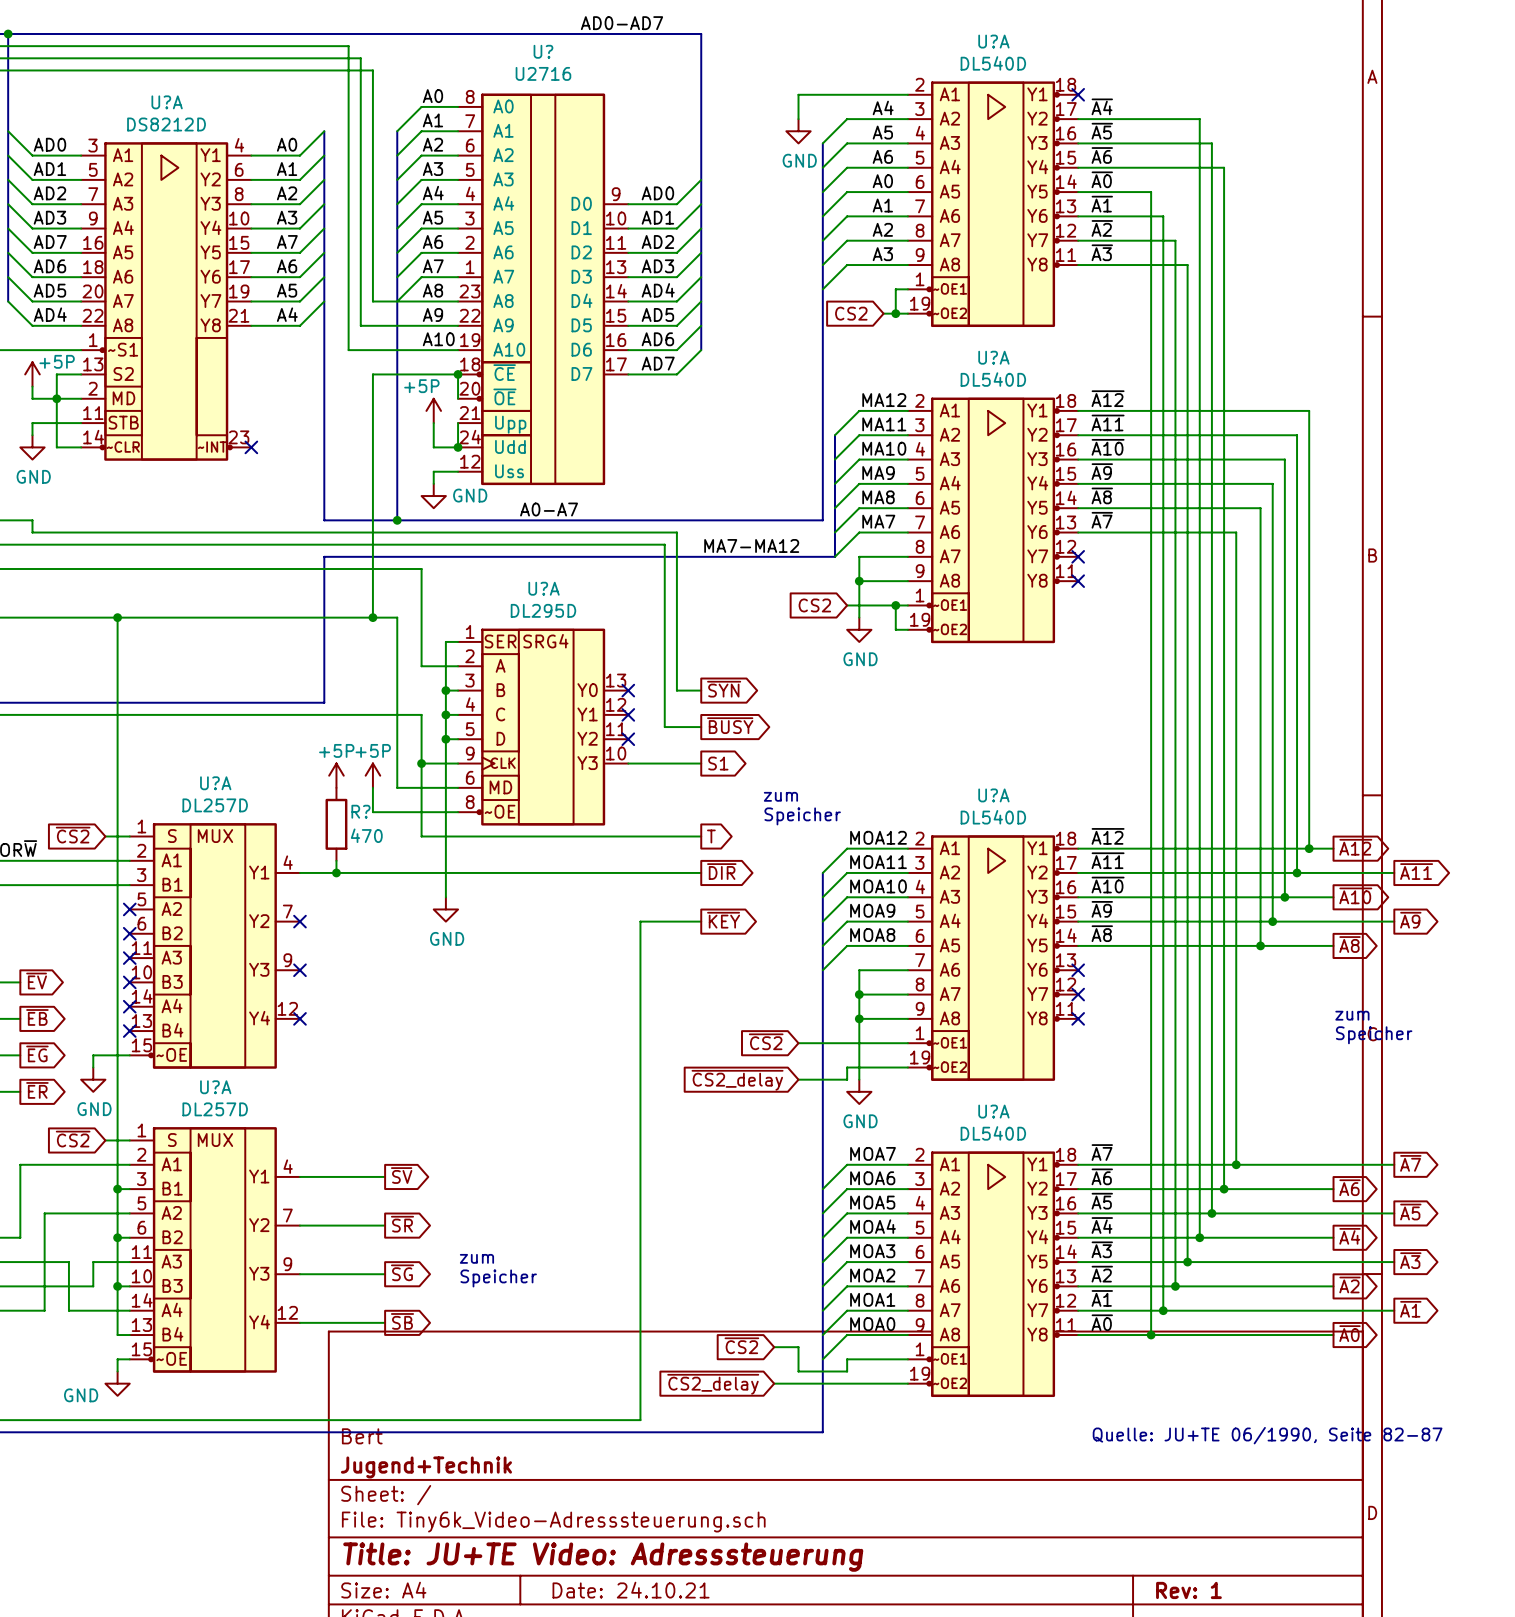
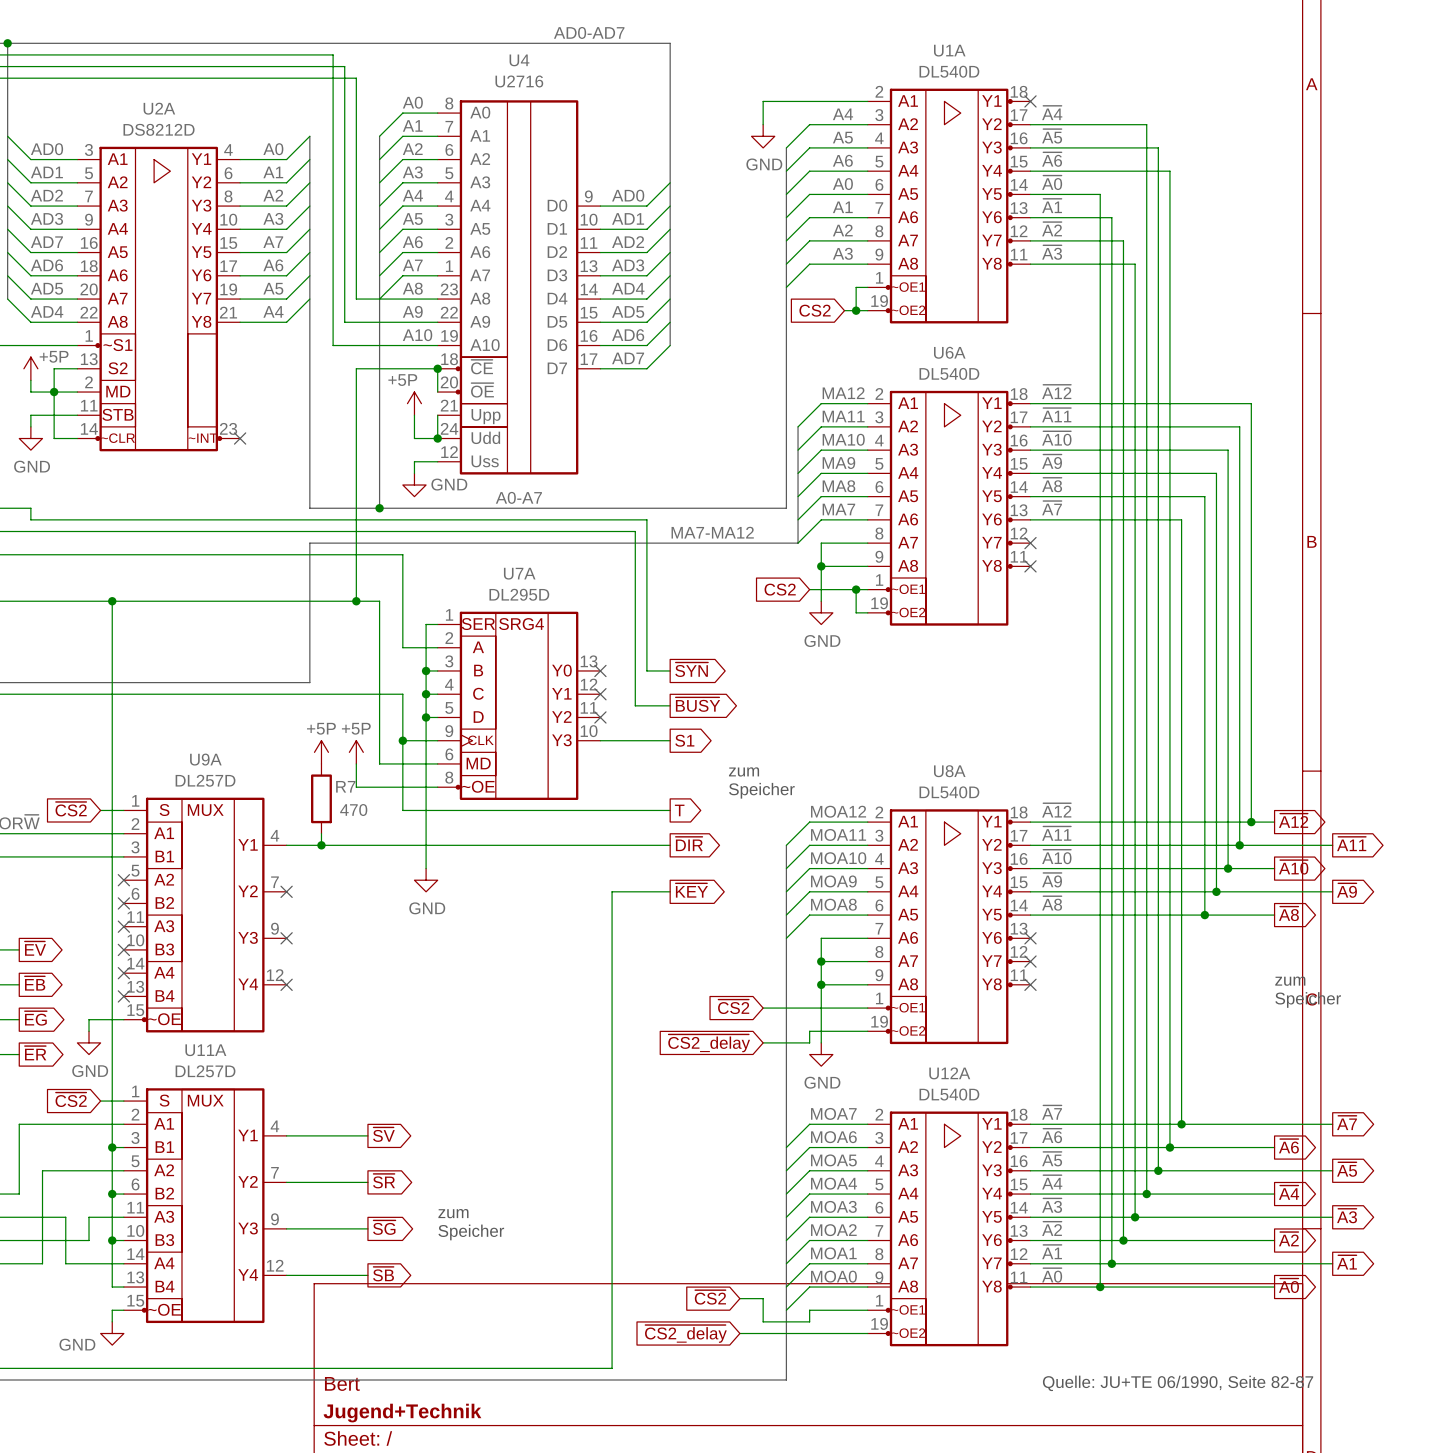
U?A name: U?A (993, 41) -> U1A (949, 50)
U? name: U? (543, 51) -> U4 (519, 60)
U?A name: U?A (167, 102) -> U2A (159, 108)
U?A name: U?A (993, 357) -> U6A (949, 352)
U?A name: U?A (544, 588) -> U7A (519, 573)
U?A name: U?A (215, 783) -> U9A (205, 759)
U?A name: U?A (993, 795) -> U8A (949, 771)
R? name: R? (360, 811) -> R7 (345, 786)
U?A name: U?A (215, 1087) -> U11A (205, 1050)
U?A name: U?A (993, 1111) -> U12A (949, 1073)

